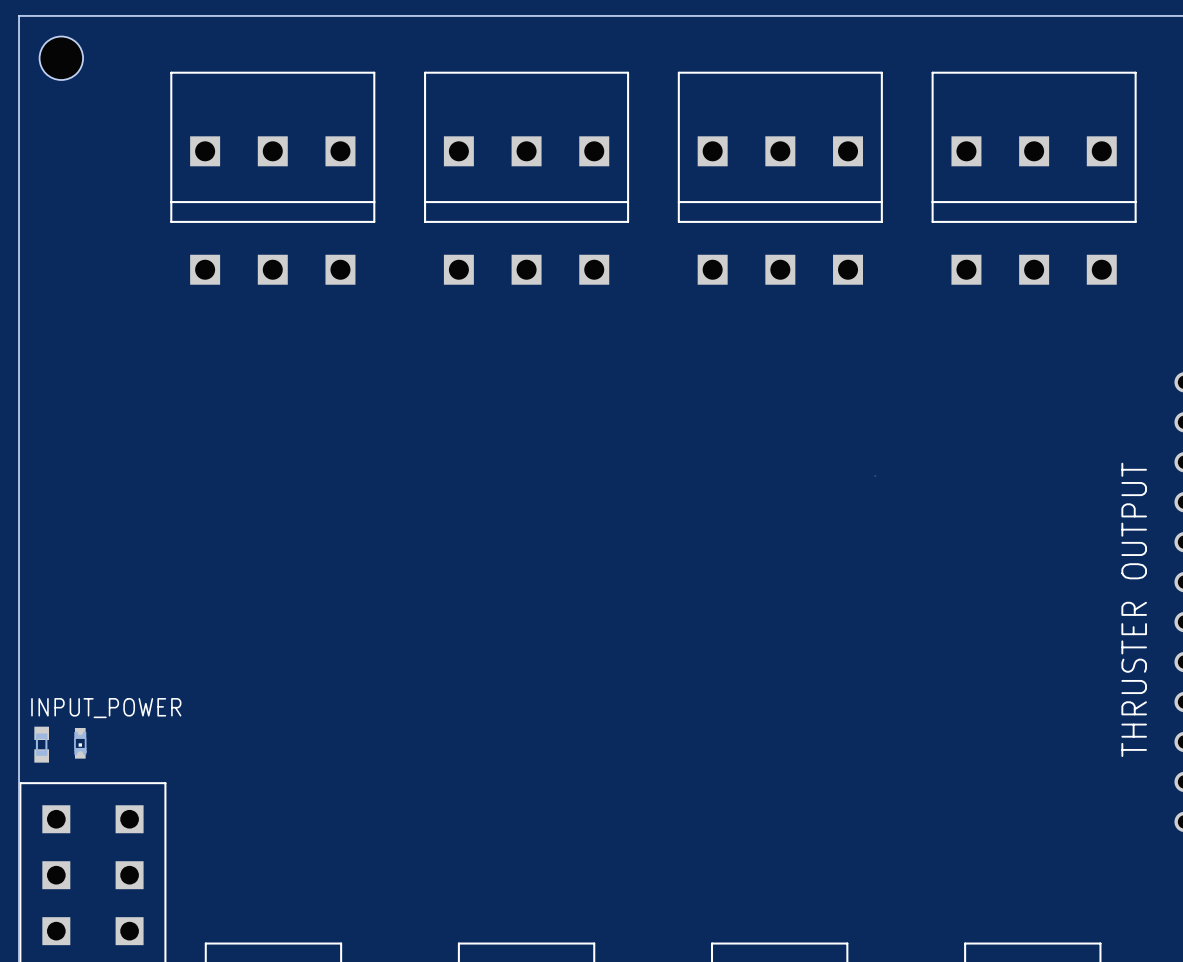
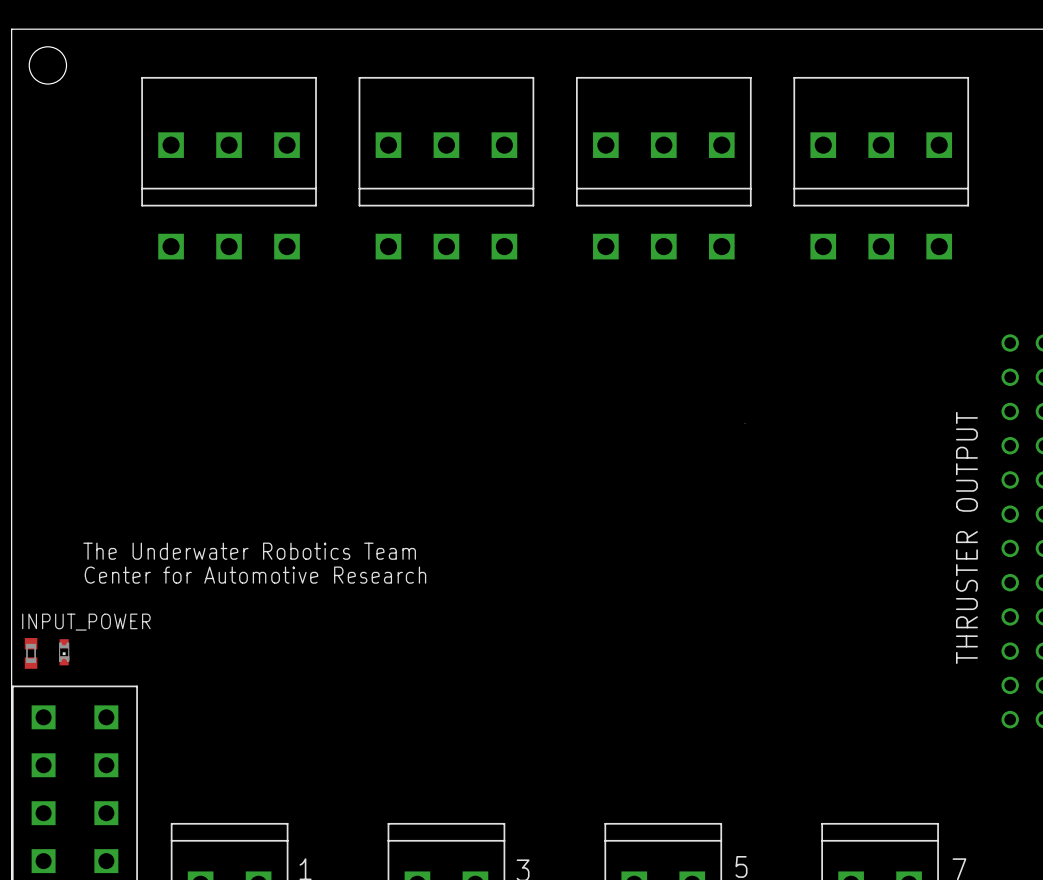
text: none -> The Underwater Robotics Team (249, 551)
text: none -> Center for Automotive Research (255, 575)

